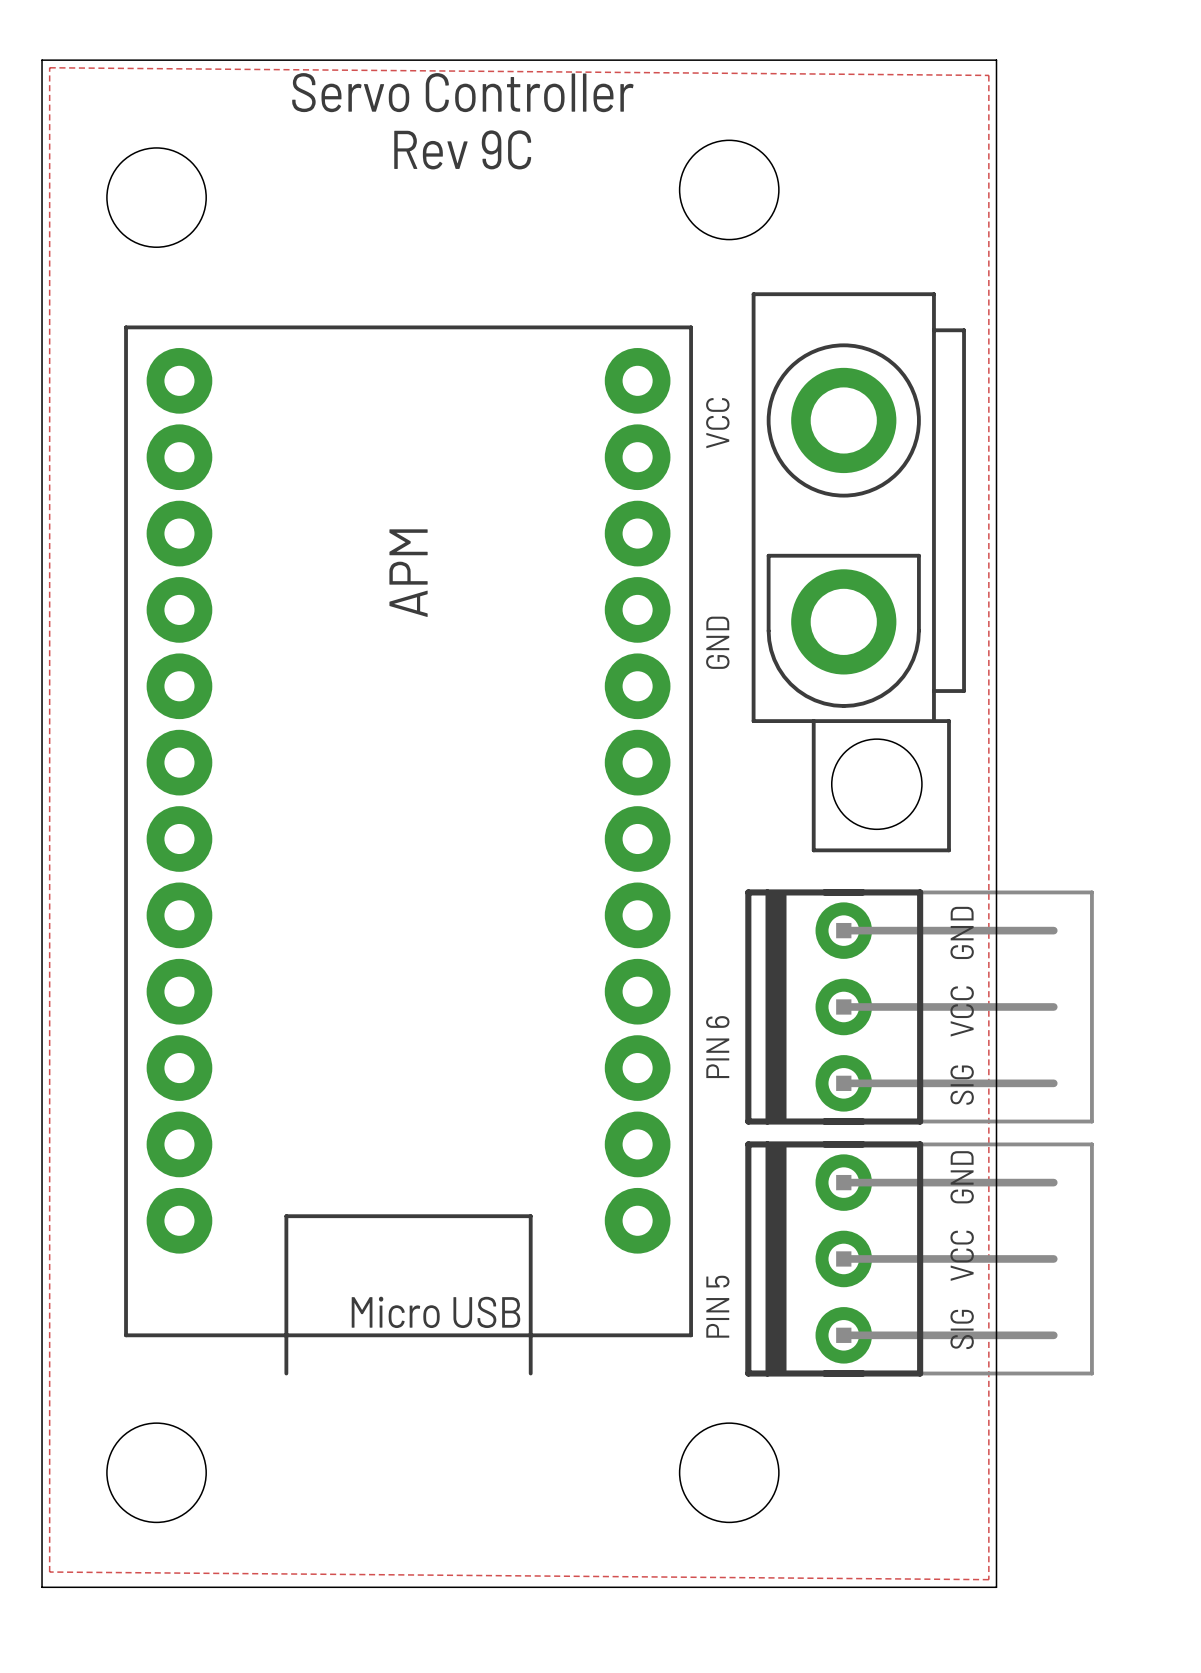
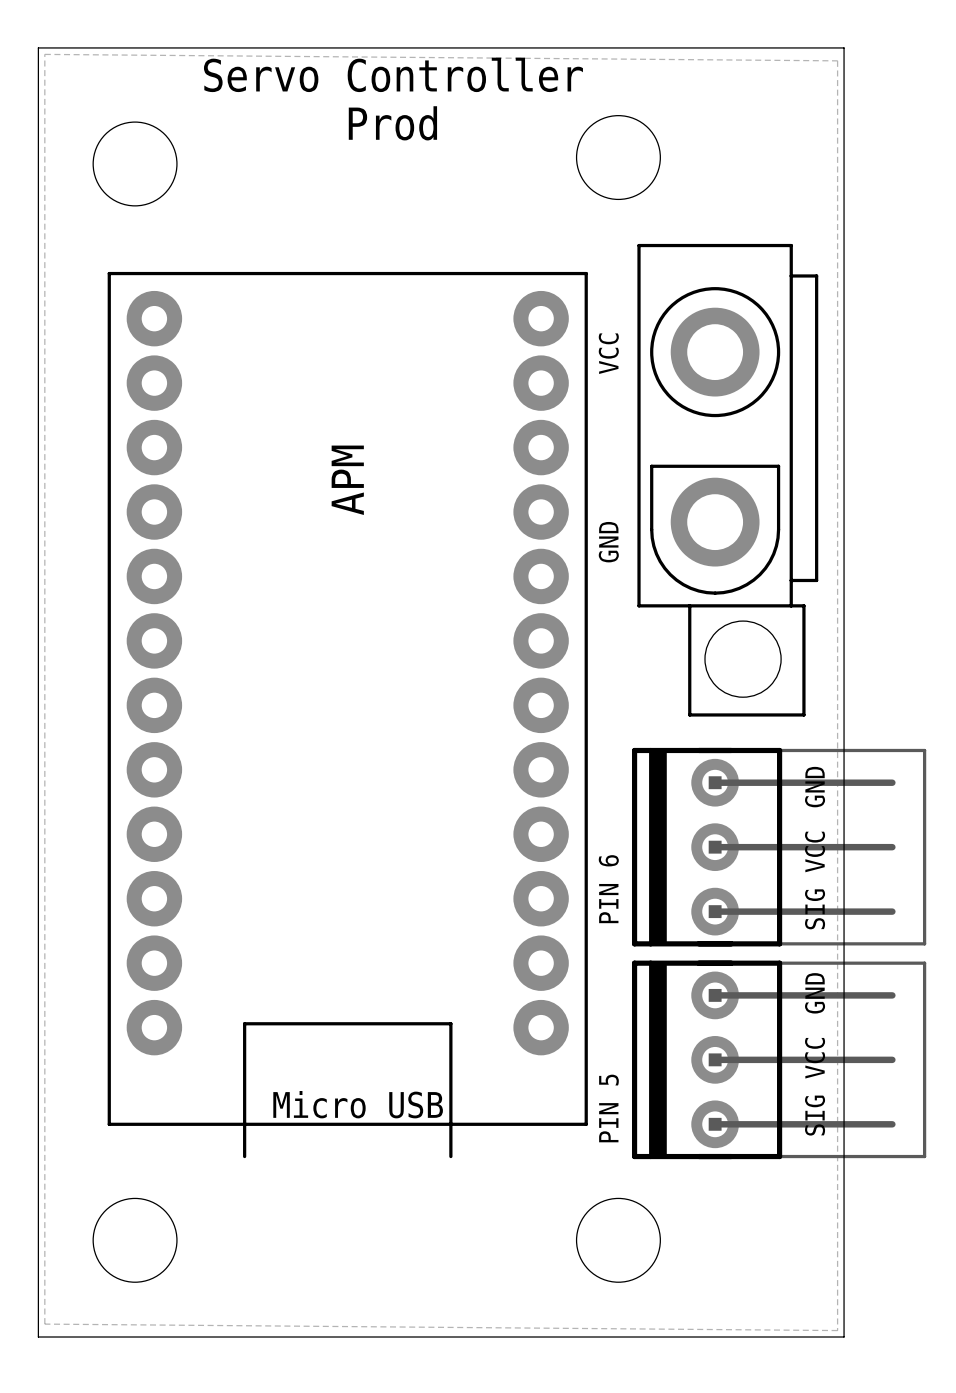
text: Rev 9C (462, 149) -> Prod (392, 123)

